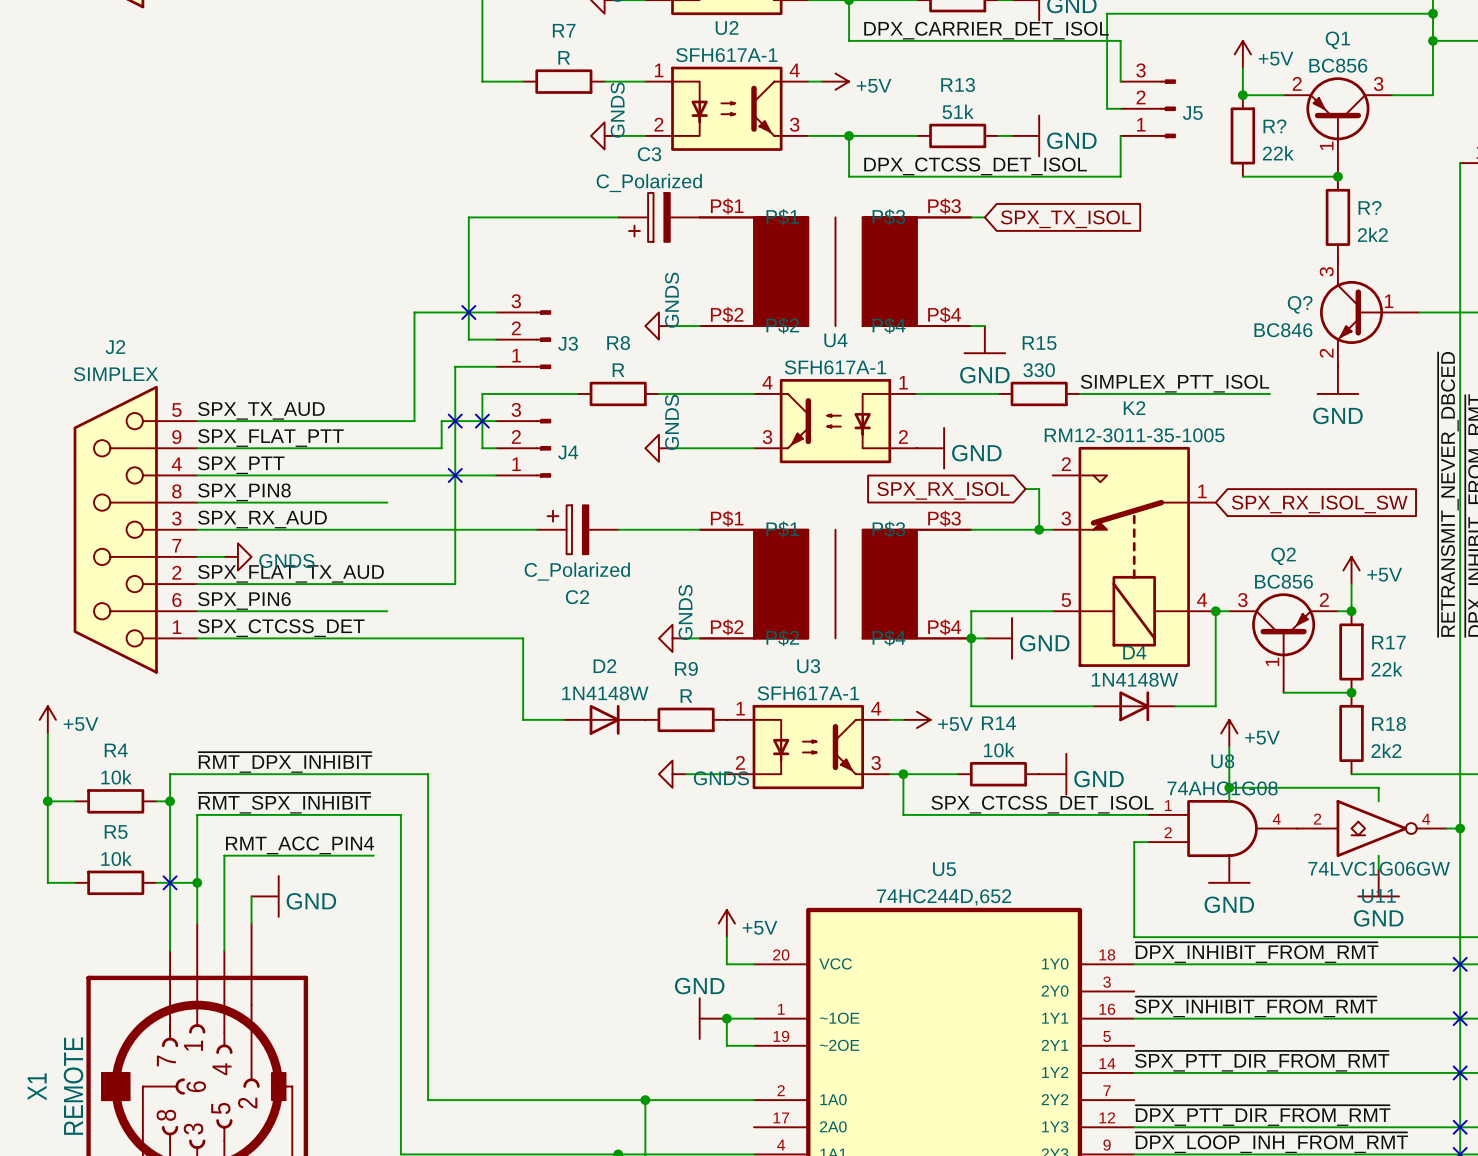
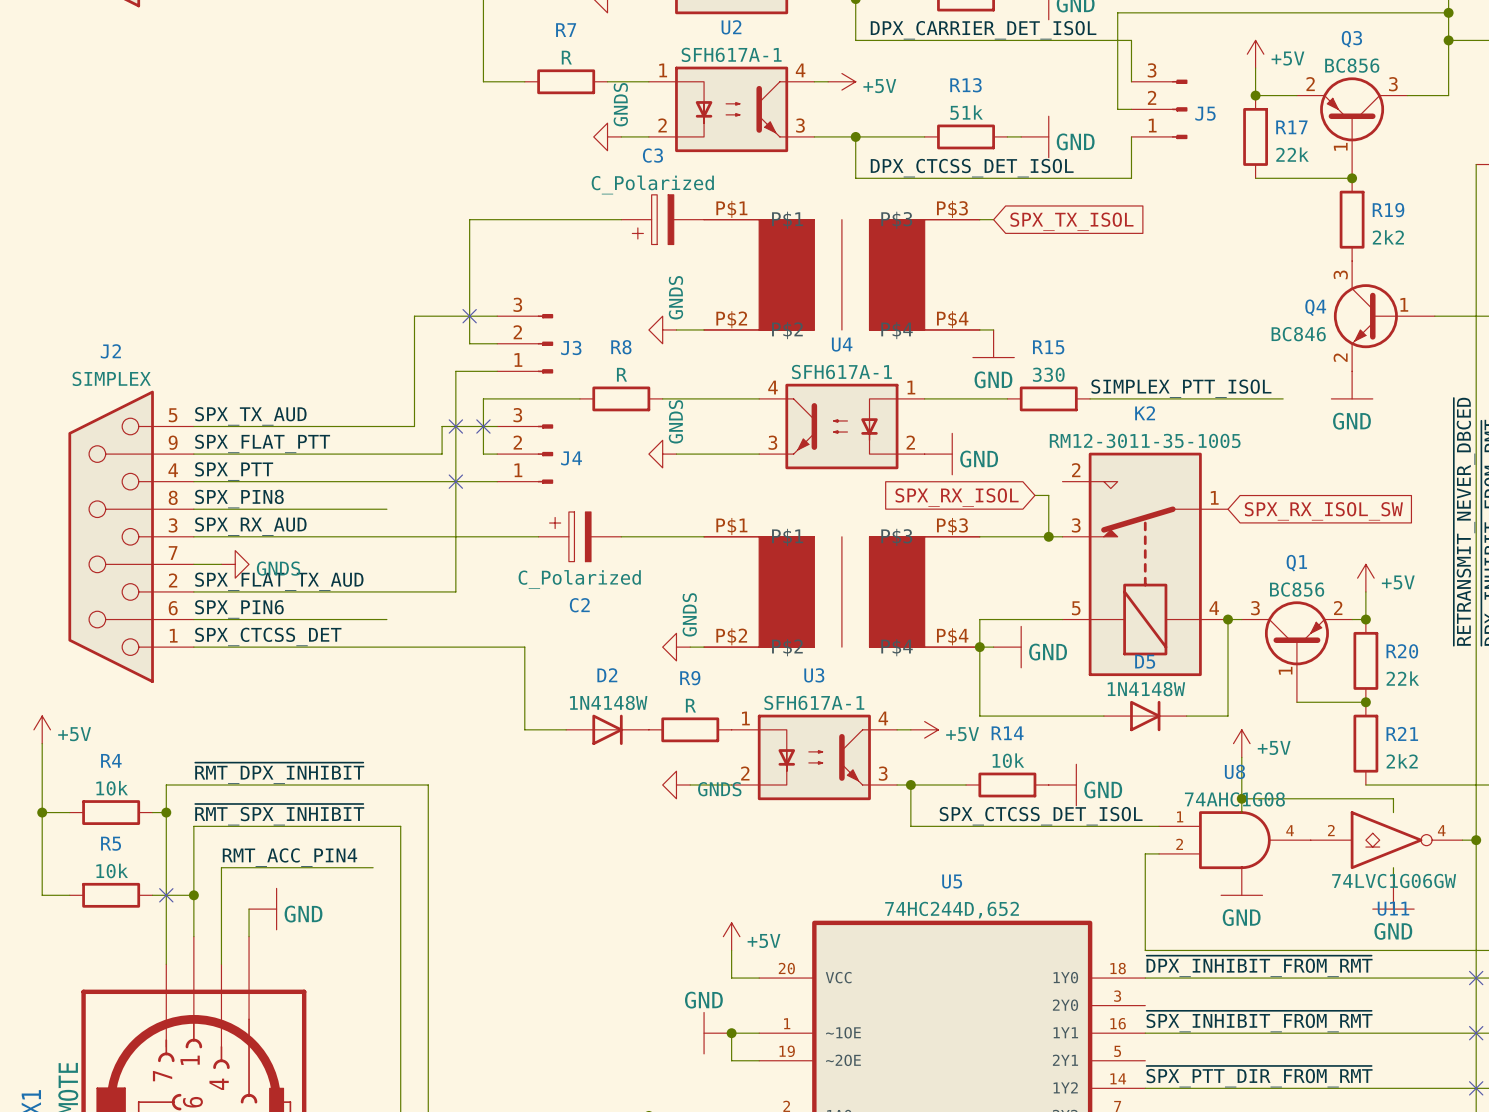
Q1 name: Q1 (1337, 40) -> Q3 (1351, 39)
R? name: R? (1274, 126) -> R17 (1291, 127)
R? name: R? (1370, 207) -> R19 (1388, 210)
Q? name: Q? (1300, 304) -> Q4 (1315, 307)
Q2 name: Q2 (1283, 556) -> Q1 (1296, 563)
R17 name: R17 (1388, 642) -> R20 (1402, 651)
D4 name: D4 (1134, 652) -> D5 (1145, 661)
R18 name: R18 (1389, 724) -> R21 (1402, 733)

